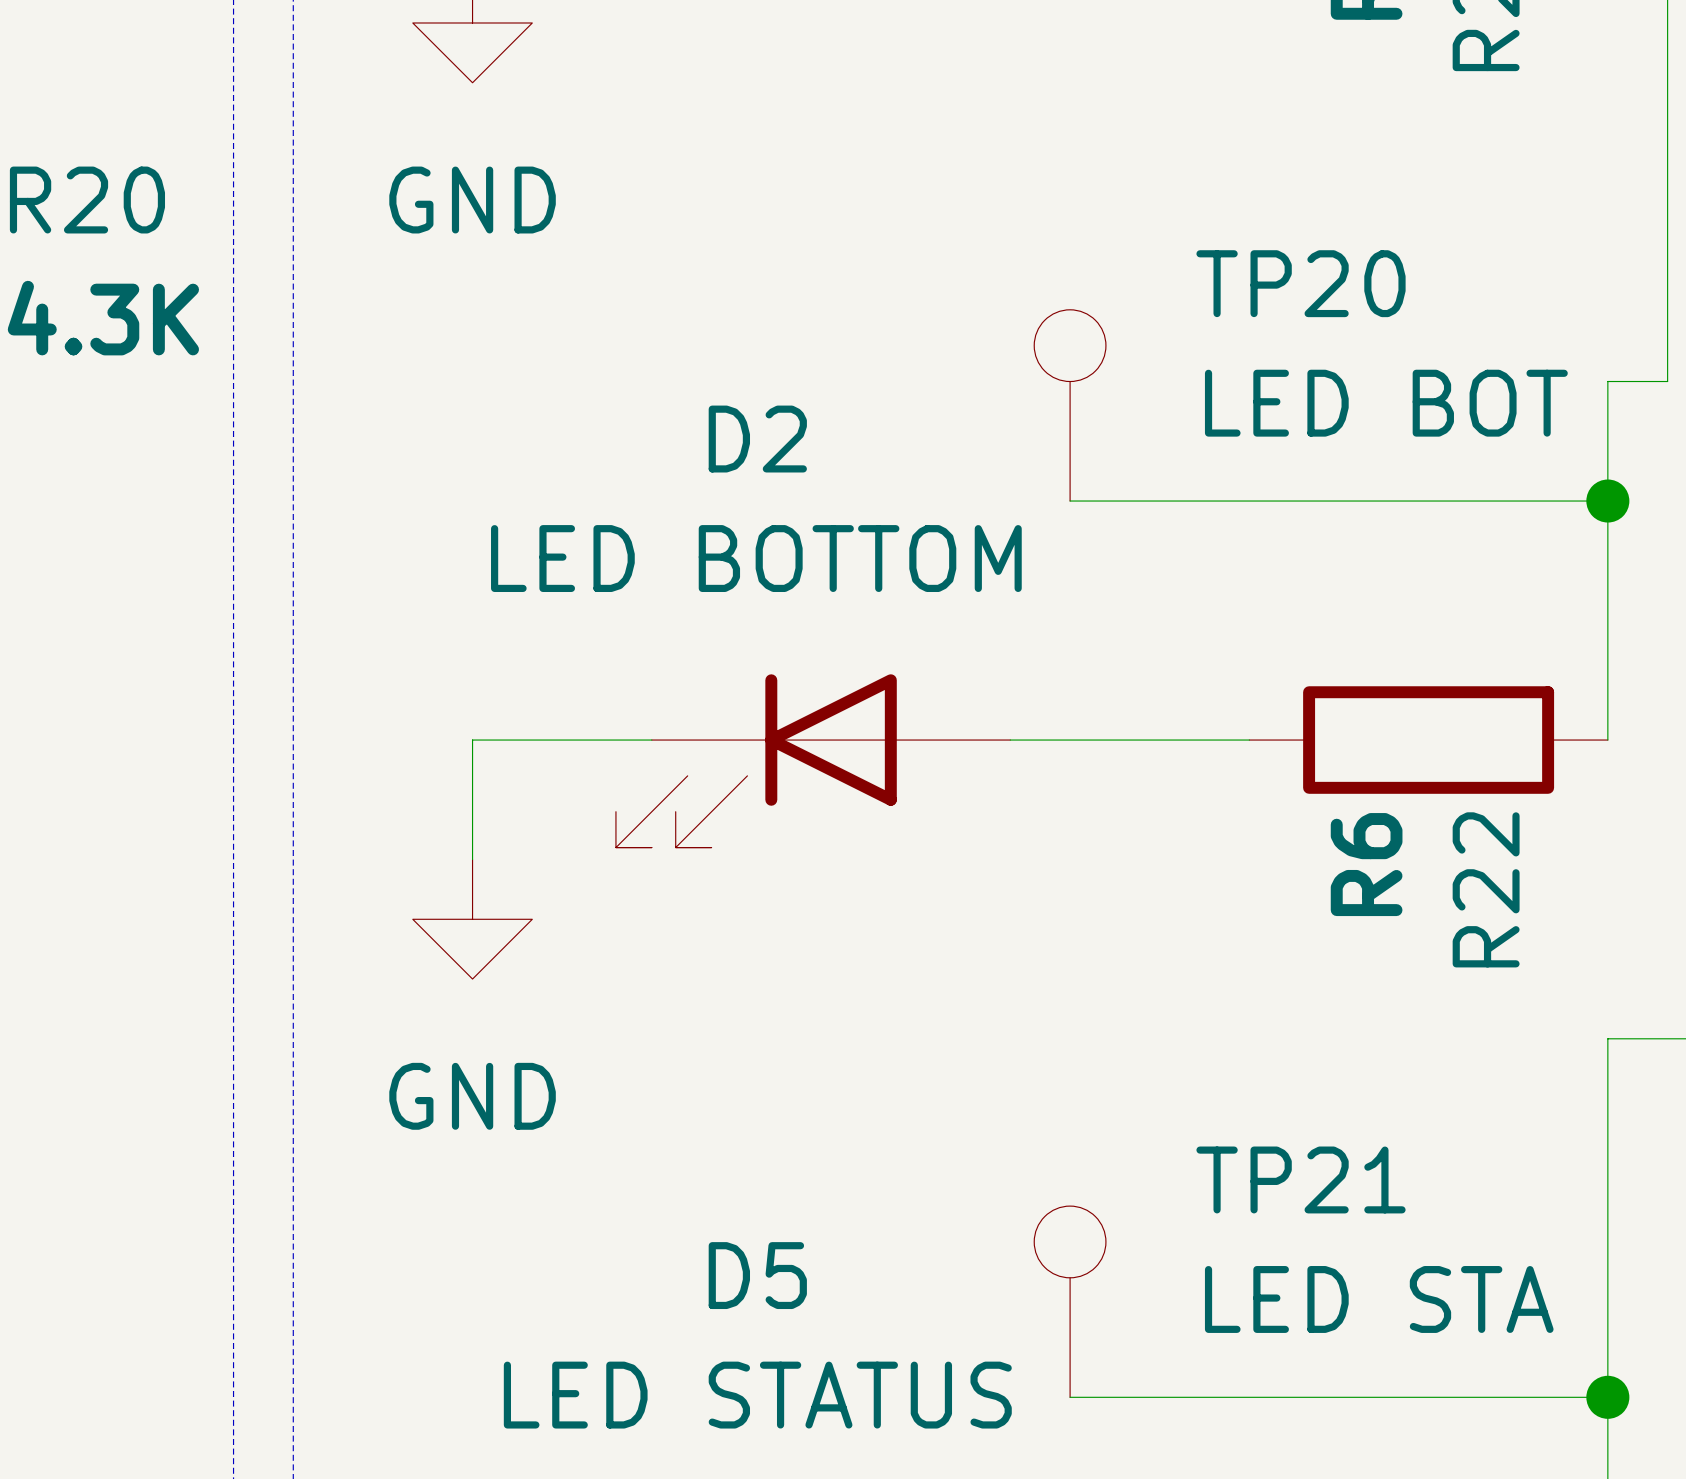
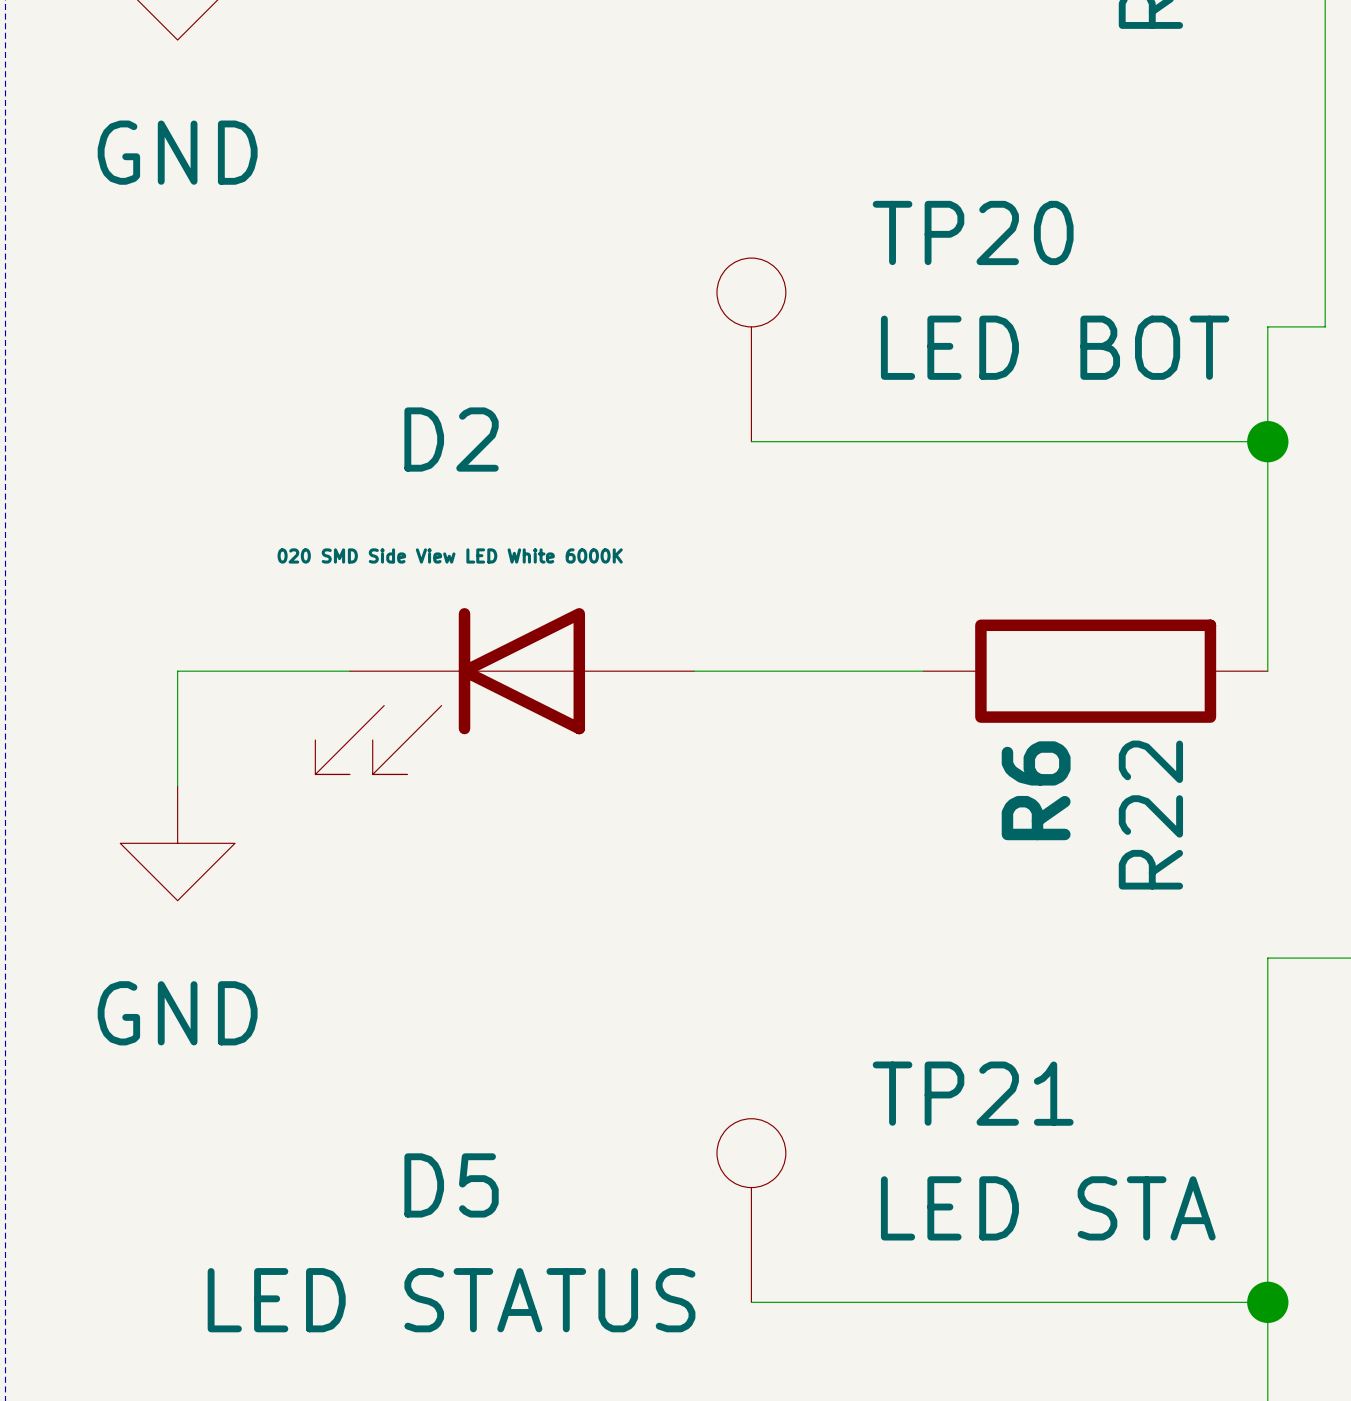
D2 name position: D2 (757, 439) -> D2 (451, 439)
D2 value: LED BOTTOM (756, 558) -> 020 SMD Side View LED White 6000K (450, 555)

